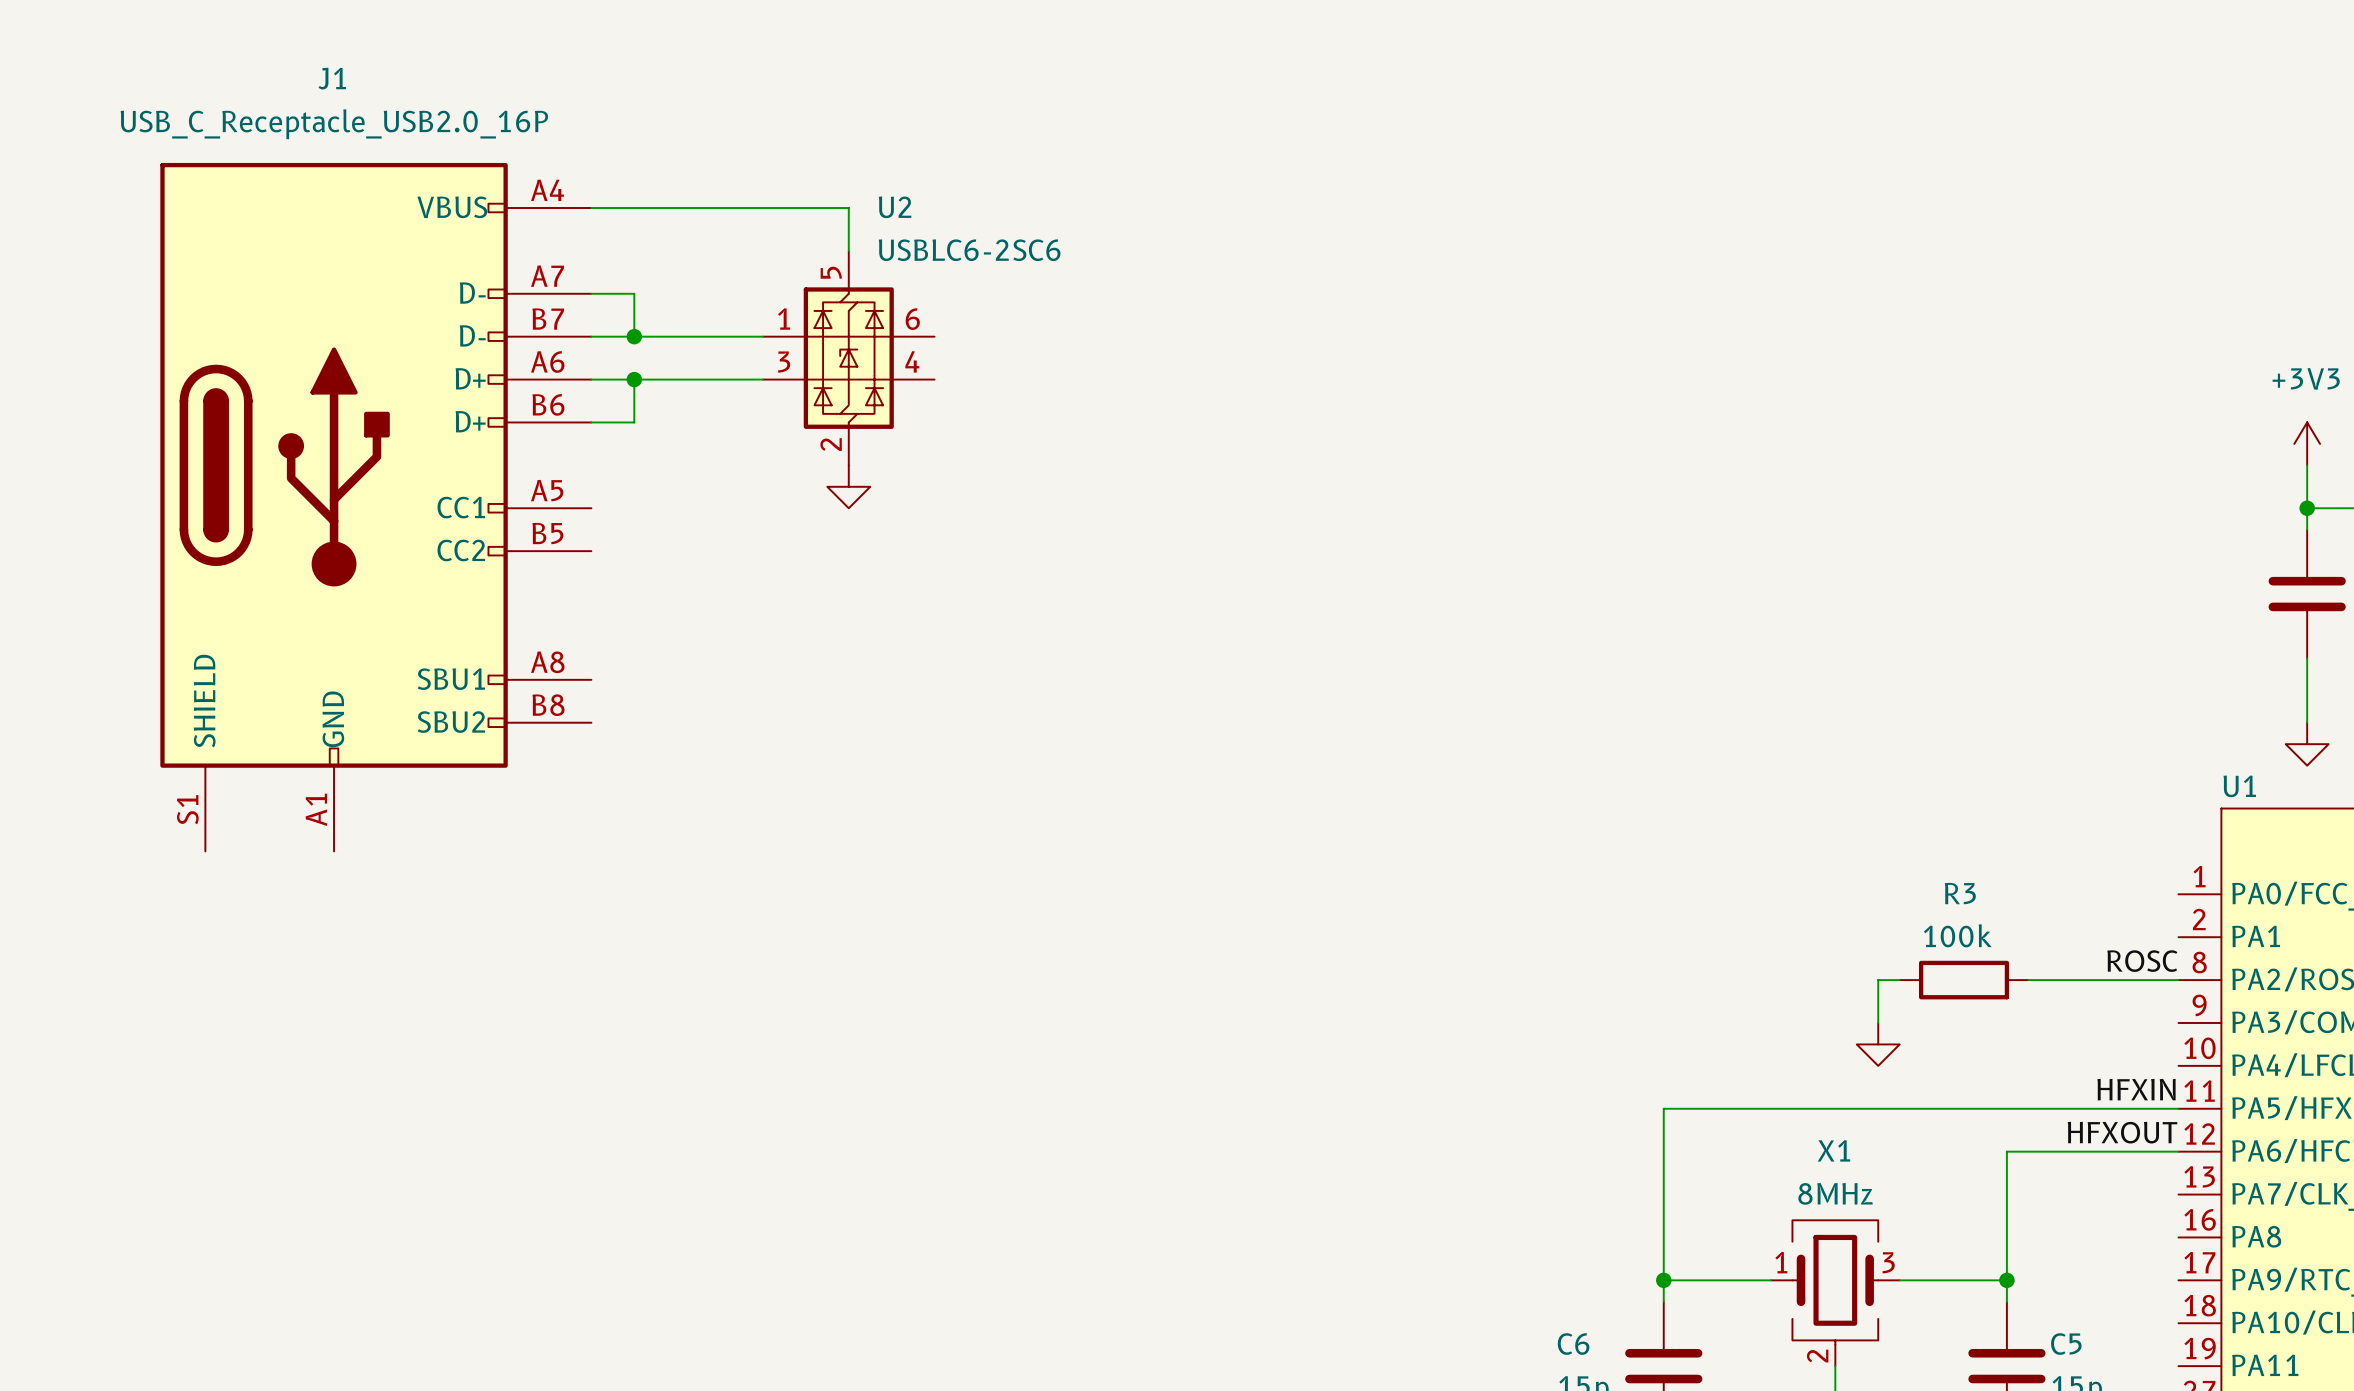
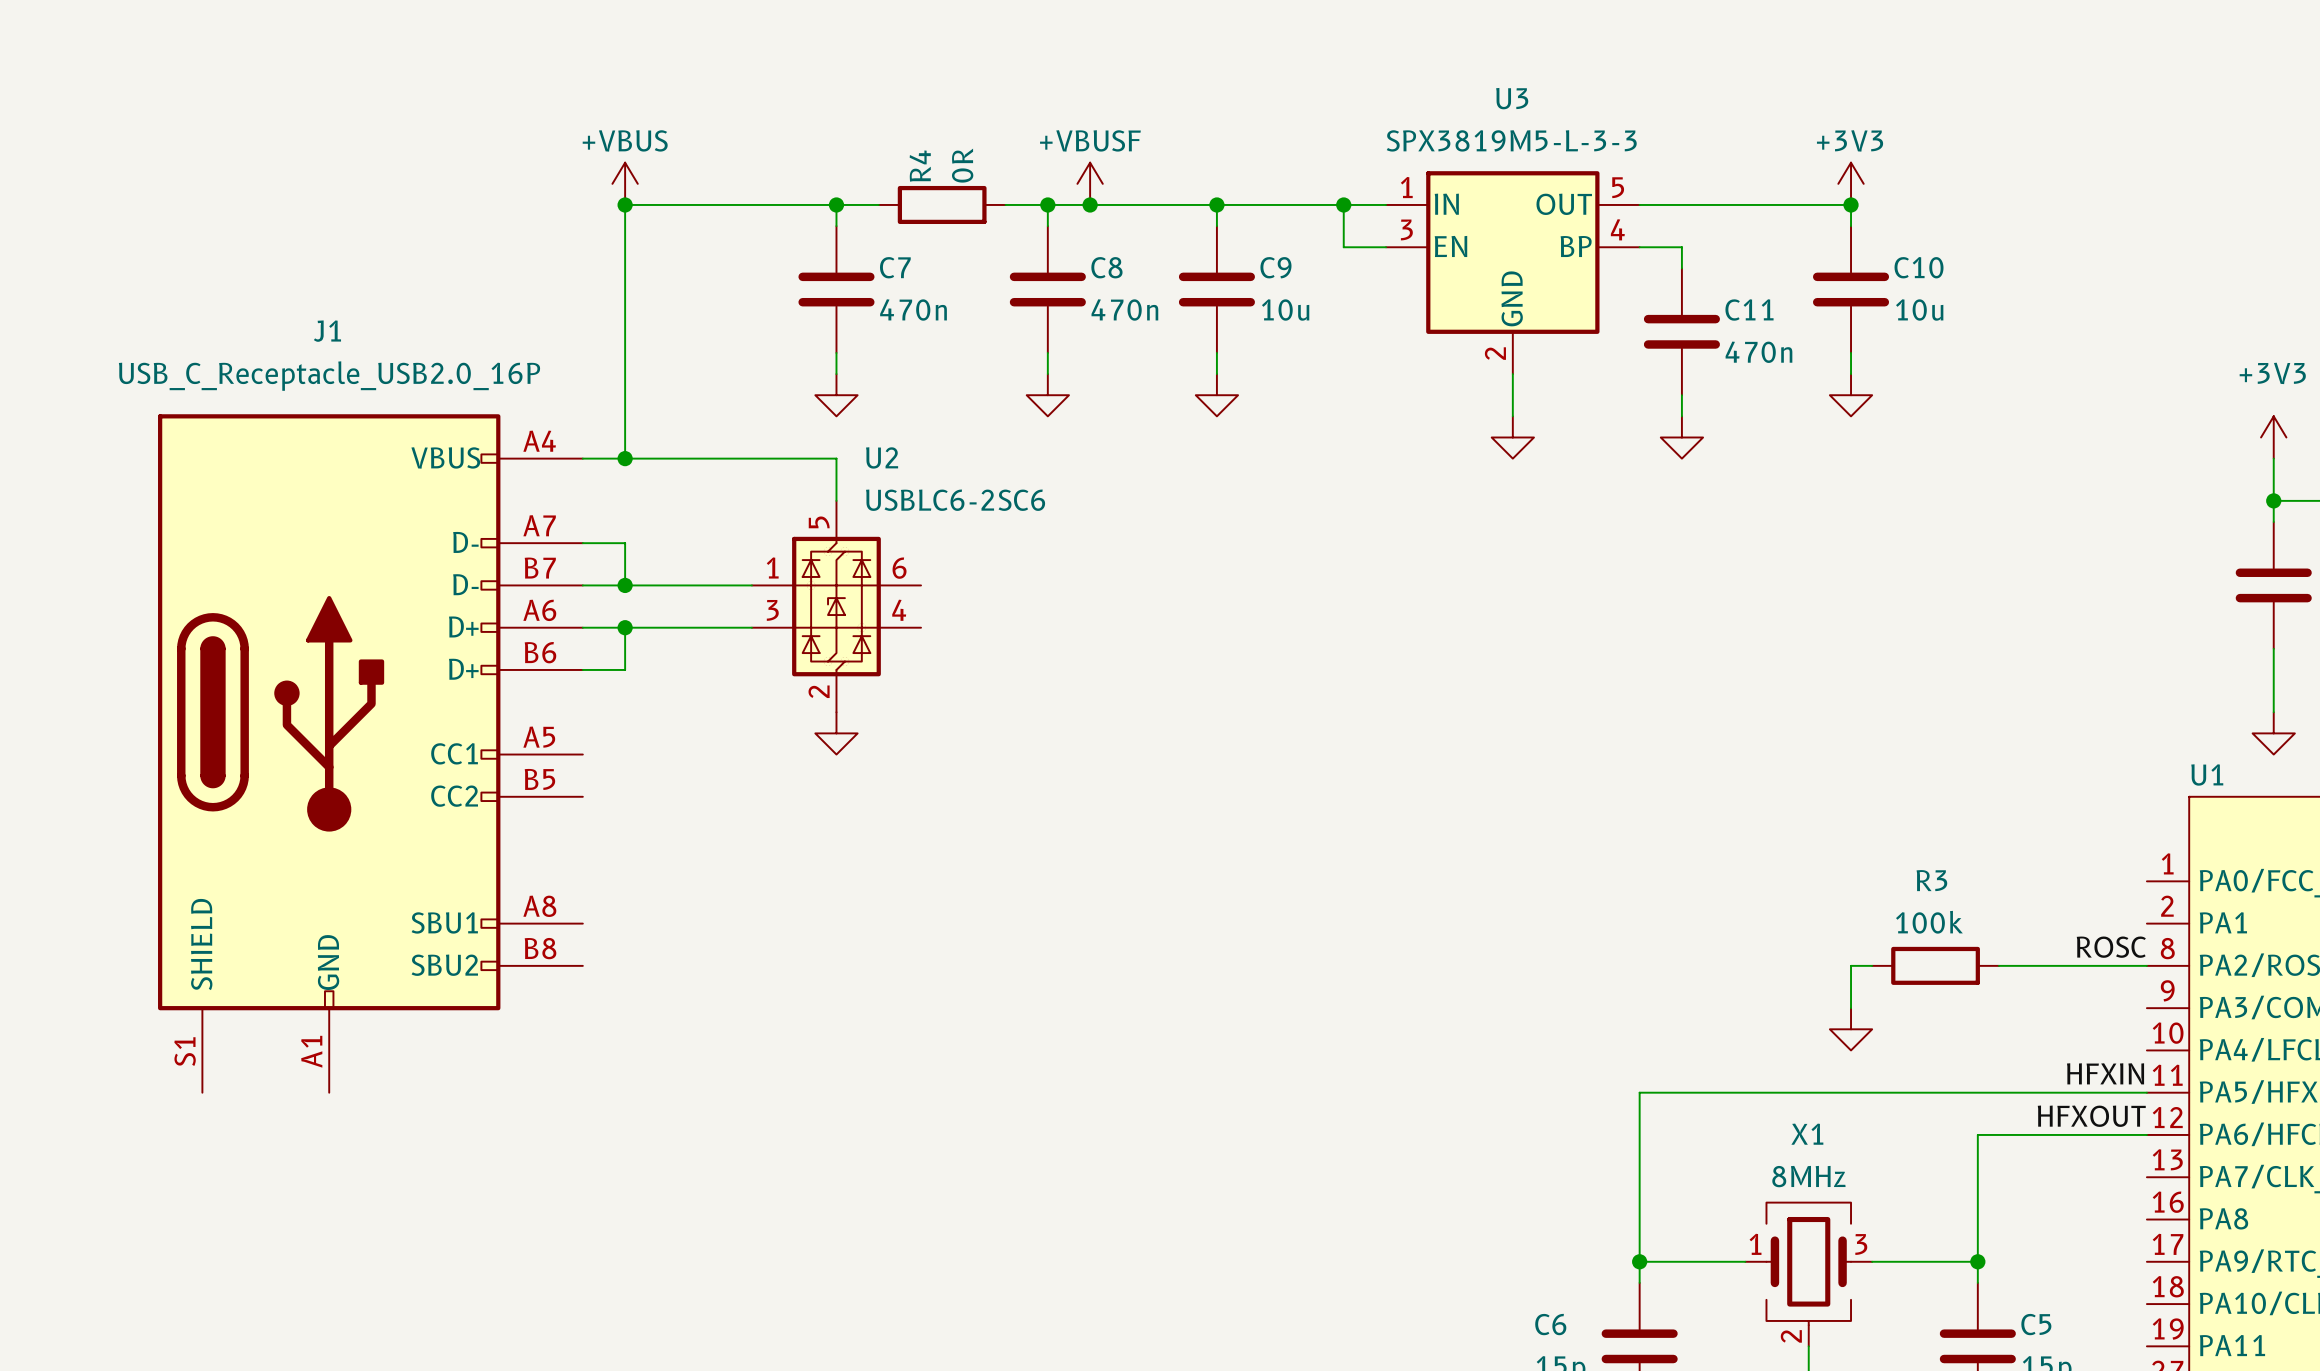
power symbol: none -> +VBUS (625, 183)
power symbol: none -> +VBUSF (1090, 183)
power symbol: none -> +3V3 (1851, 183)
wire: (591, 208) (634, 208) -> (625, 289) (625, 204)
junction: none -> (625, 204)
junction: none -> (836, 204)
R4: none -> 0R (942, 204)
wire: none -> (1005, 204) (1386, 204)
wire: none -> (1047, 204) (1047, 226)
junction: none -> (1047, 204)
junction: none -> (1090, 204)
wire: none -> (1216, 204) (1216, 226)
junction: none -> (1216, 204)
wire: none -> (1343, 204) (1343, 247) (1386, 247)
junction: none -> (1343, 204)
wire: none -> (1639, 204) (1851, 204) (1851, 226)
junction: none -> (1851, 204)
wire: none -> (1639, 247) (1681, 247) (1681, 268)
U3: none -> SPX3819M5-L-3-3 (1512, 272)
wire: (591, 293) (634, 293) -> (836, 204) (878, 204)
C7: none -> 470n (836, 289)
C8: none -> 470n (1047, 289)
C9: none -> 10u (1216, 289)
C10: none -> 10u (1851, 289)
wire: (591, 336) (762, 336) -> (582, 585) (751, 585)
wire: none -> (625, 331) (625, 374)
junction: (634, 336) -> none
C11: none -> 470n (1681, 331)
U2 position: (848, 358) -> (836, 606)
wire: none -> (1047, 352) (1047, 374)
wire: none -> (1216, 352) (1216, 374)
wire: none -> (1851, 352) (1851, 374)
wire: (591, 379) (762, 379) -> (582, 627) (751, 627)
junction: (634, 379) -> none
wire: none -> (1512, 374) (1512, 416)
power symbol: none -> (1047, 395)
power symbol: none -> (1216, 395)
wire: none -> (1681, 395) (1681, 416)
power symbol: none -> (1851, 395)
wire: (591, 422) (634, 422) -> (625, 458) (625, 416)
power symbol: none -> (1512, 437)
power symbol: none -> (1681, 437)
wire: none -> (582, 458) (836, 458) (836, 500)
junction: none -> (625, 458)
power symbol position: (848, 486) -> (836, 395)
J1 position: (375, 507) -> (370, 753)
wire: none -> (582, 543) (625, 543) (625, 585)
junction: none -> (625, 585)
wire: none -> (625, 627) (625, 669) (582, 669)
junction: none -> (625, 627)
power symbol: none -> (836, 733)

